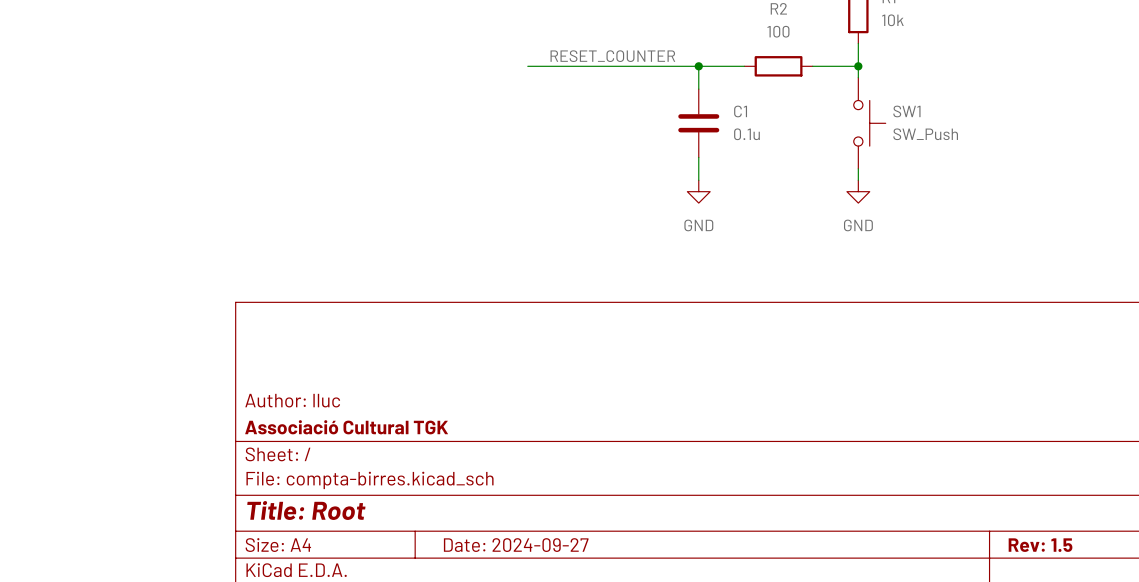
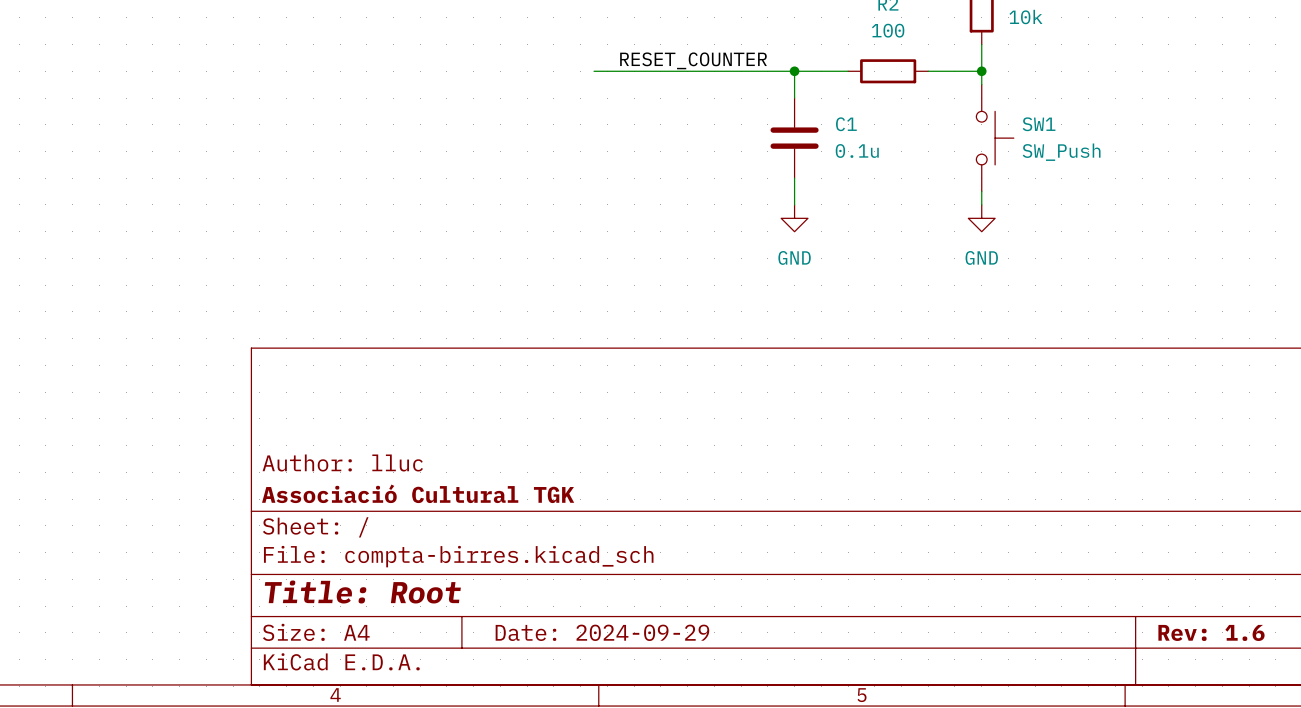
title block: Date: 2024-09-27 (516, 545) -> Date: 2024-09-29 (602, 632)
title block: Rev: 1.5 (1040, 545) -> Rev: 1.6 (1211, 632)

